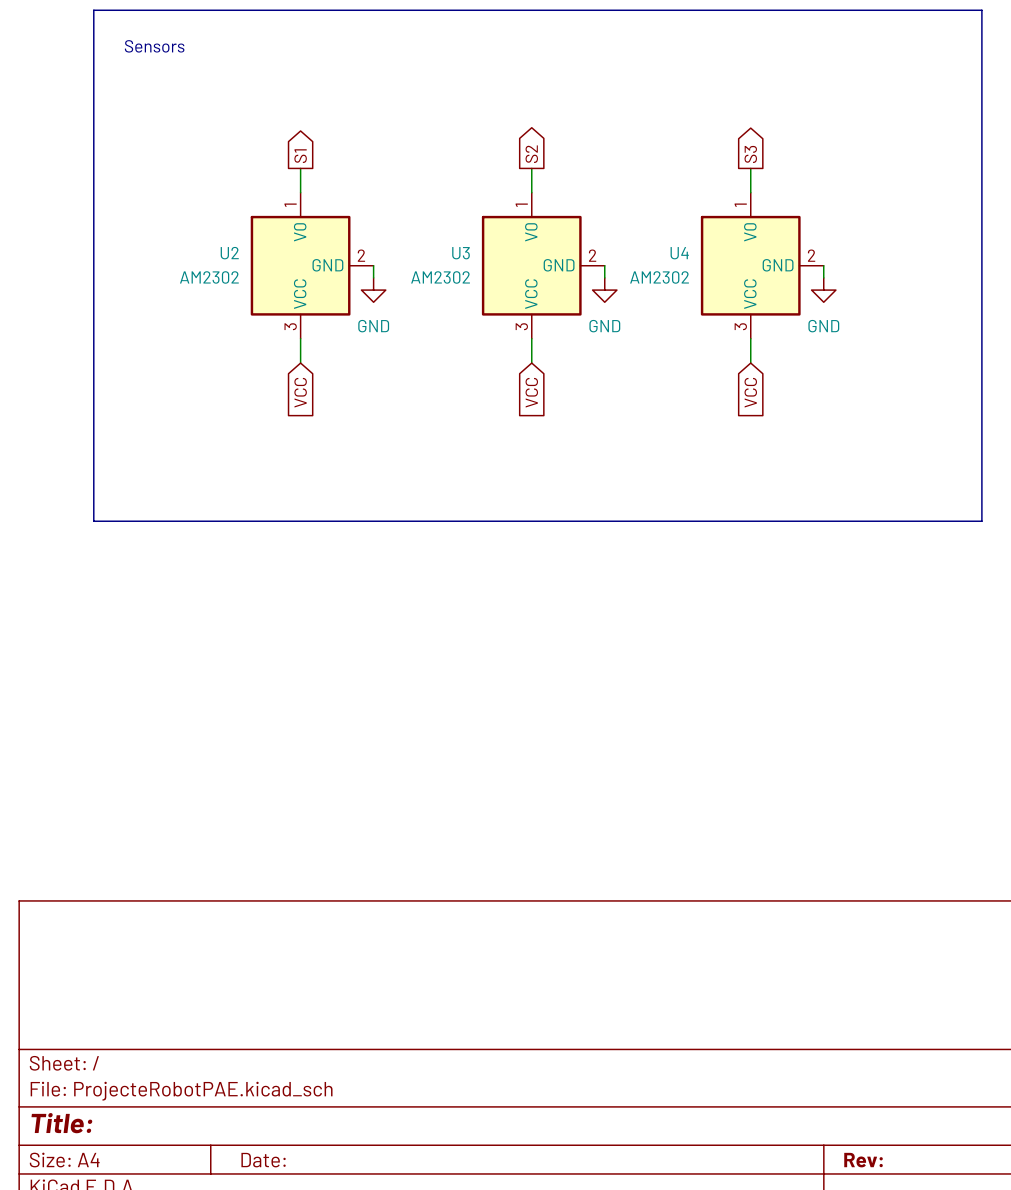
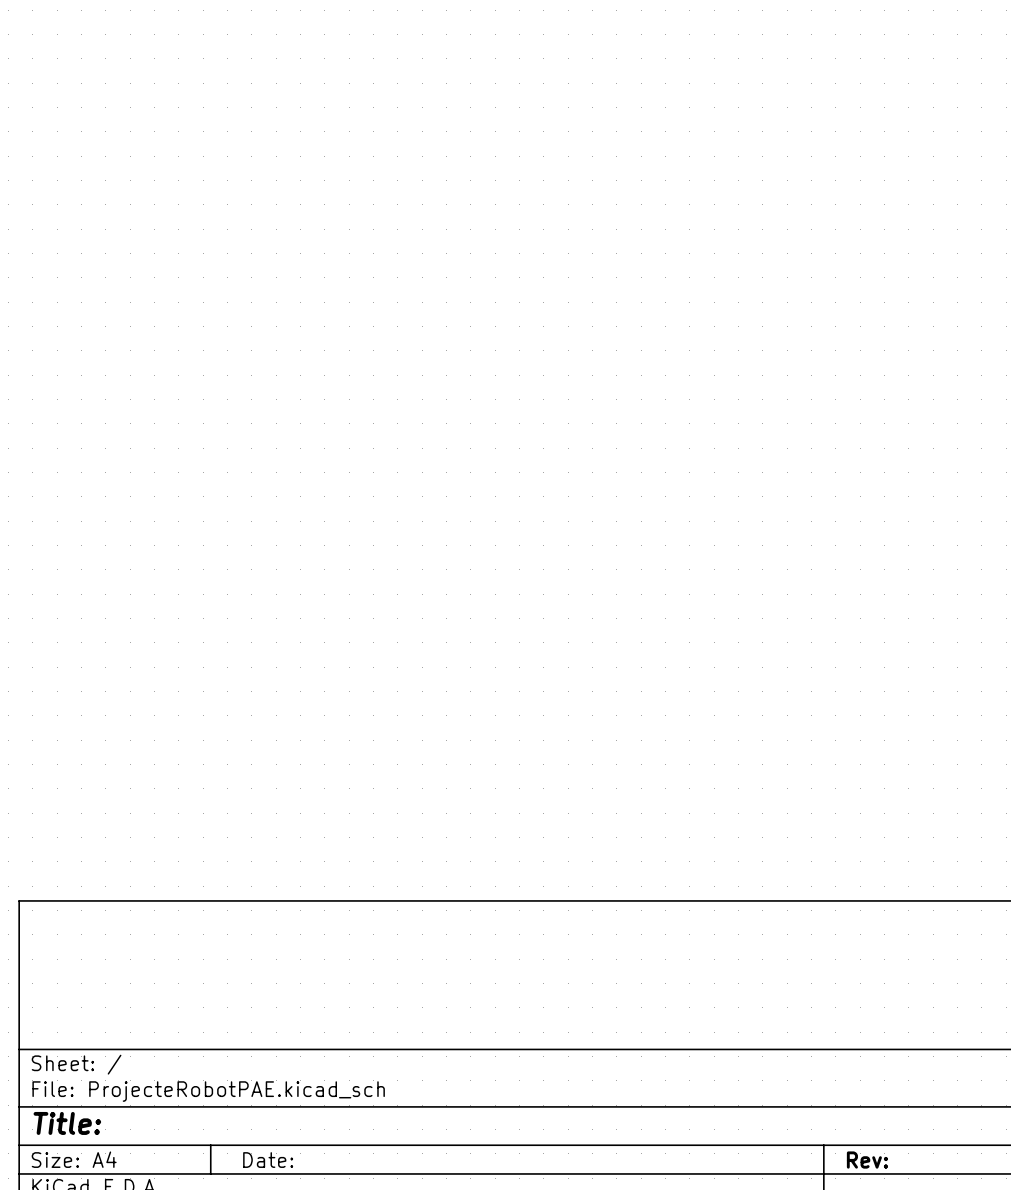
line: (93, 10) (981, 10) (981, 521) (93, 521) (93, 10) -> none
text: Sensors (154, 46) -> none
global label: S2 (531, 154) -> none
global label: S3 (750, 154) -> none
global label: S1 (300, 156) -> none
wire: (300, 168) (300, 192) -> none
wire: (531, 168) (531, 192) -> none
wire: (750, 168) (750, 192) -> none
U2: AM2302 (312, 265) -> none
wire: (373, 265) (373, 277) -> none
U3: AM2302 (543, 265) -> none
wire: (604, 265) (604, 277) -> none
U4: AM2302 (762, 265) -> none
wire: (823, 265) (823, 277) -> none
power symbol: GND (373, 290) -> none
power symbol: GND (604, 290) -> none
power symbol: GND (823, 290) -> none
wire: (300, 338) (300, 363) -> none
wire: (531, 338) (531, 363) -> none
wire: (750, 338) (750, 363) -> none
global label: VCC (300, 392) -> none
global label: VCC (531, 392) -> none
global label: VCC (750, 392) -> none

